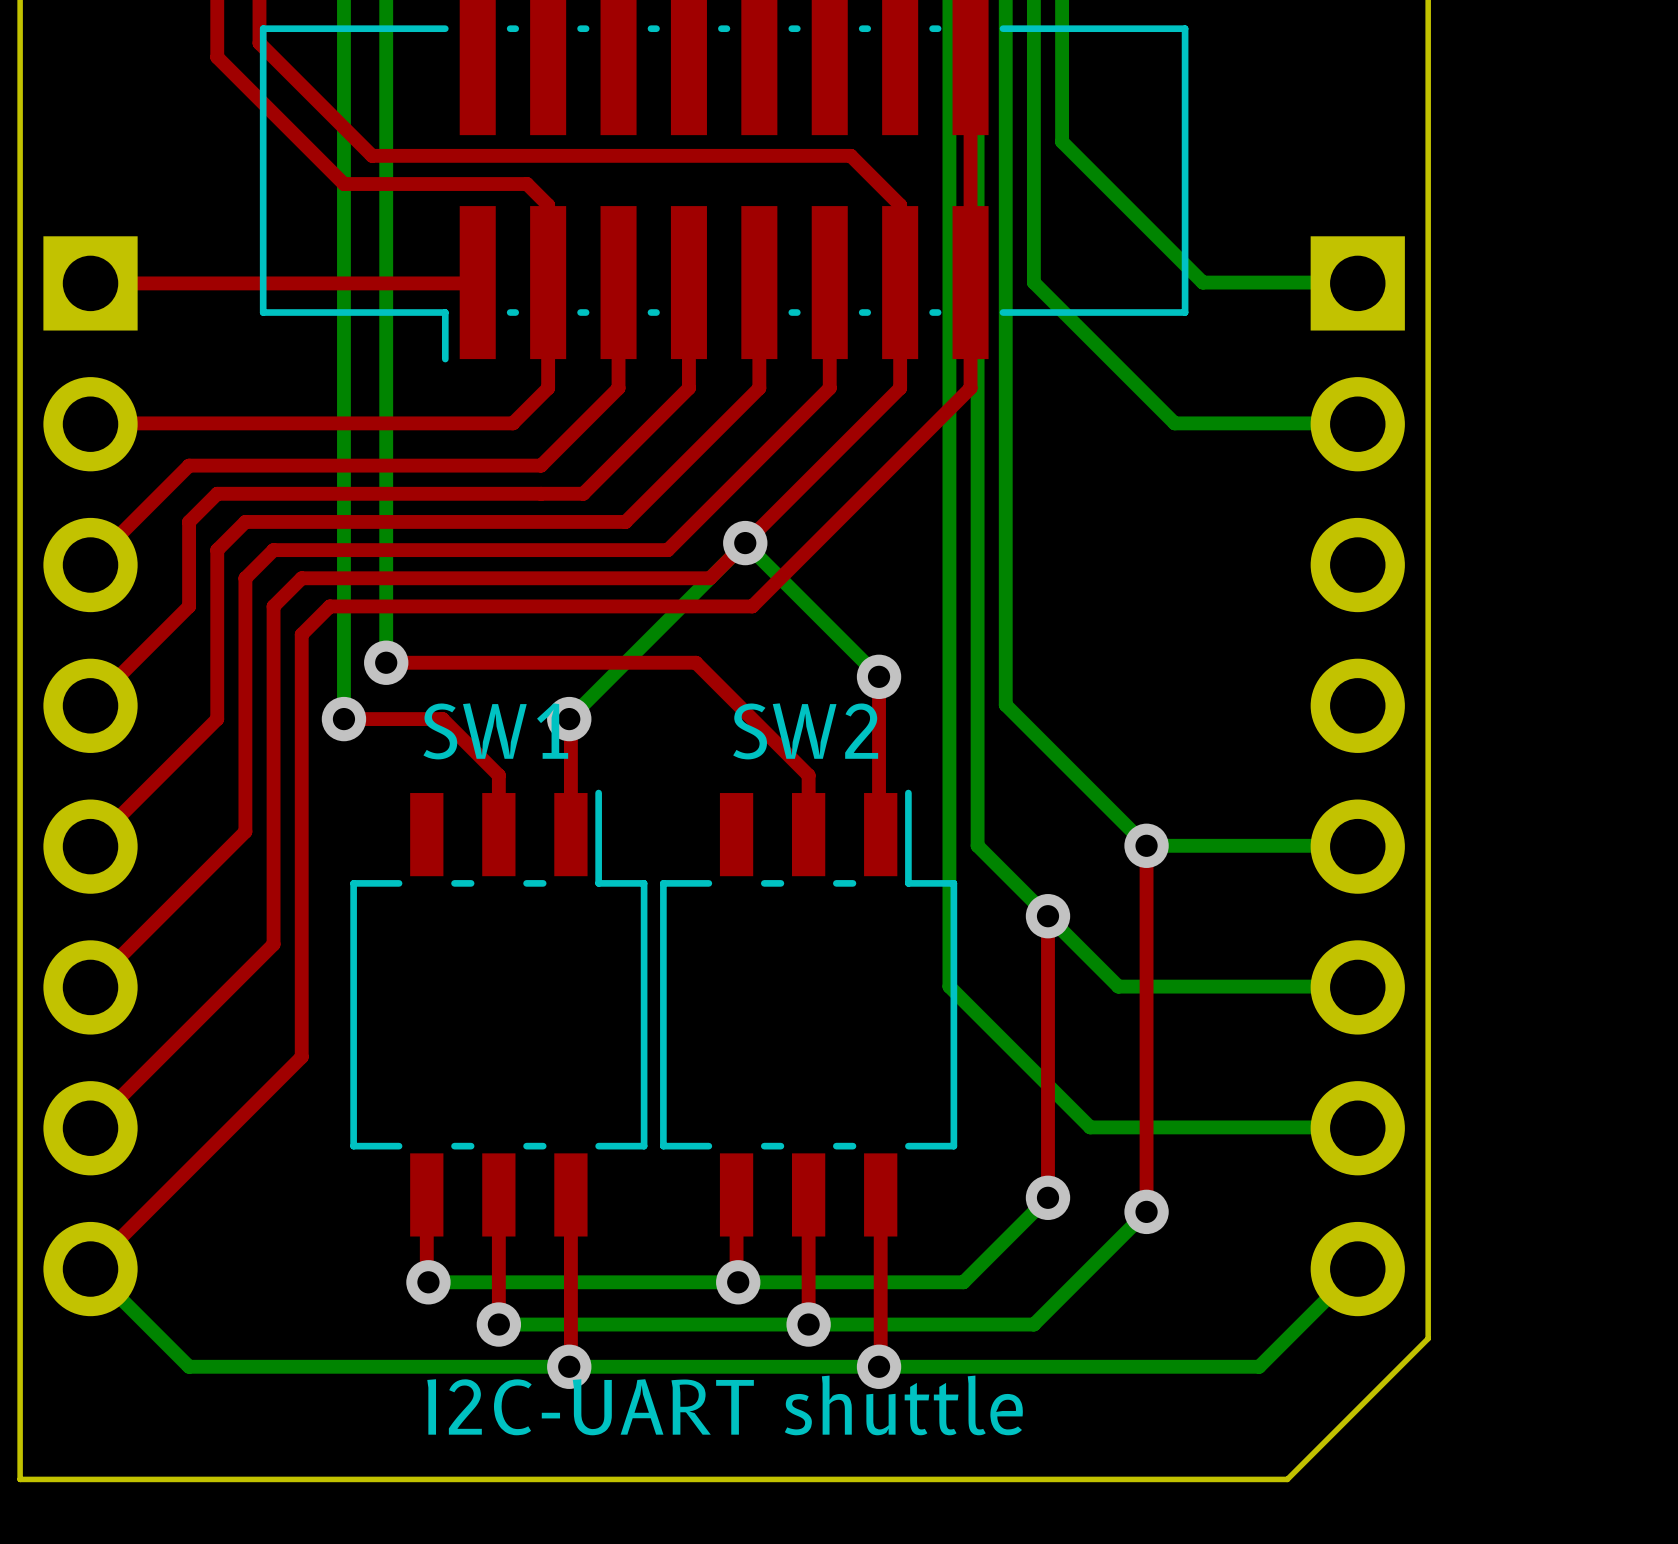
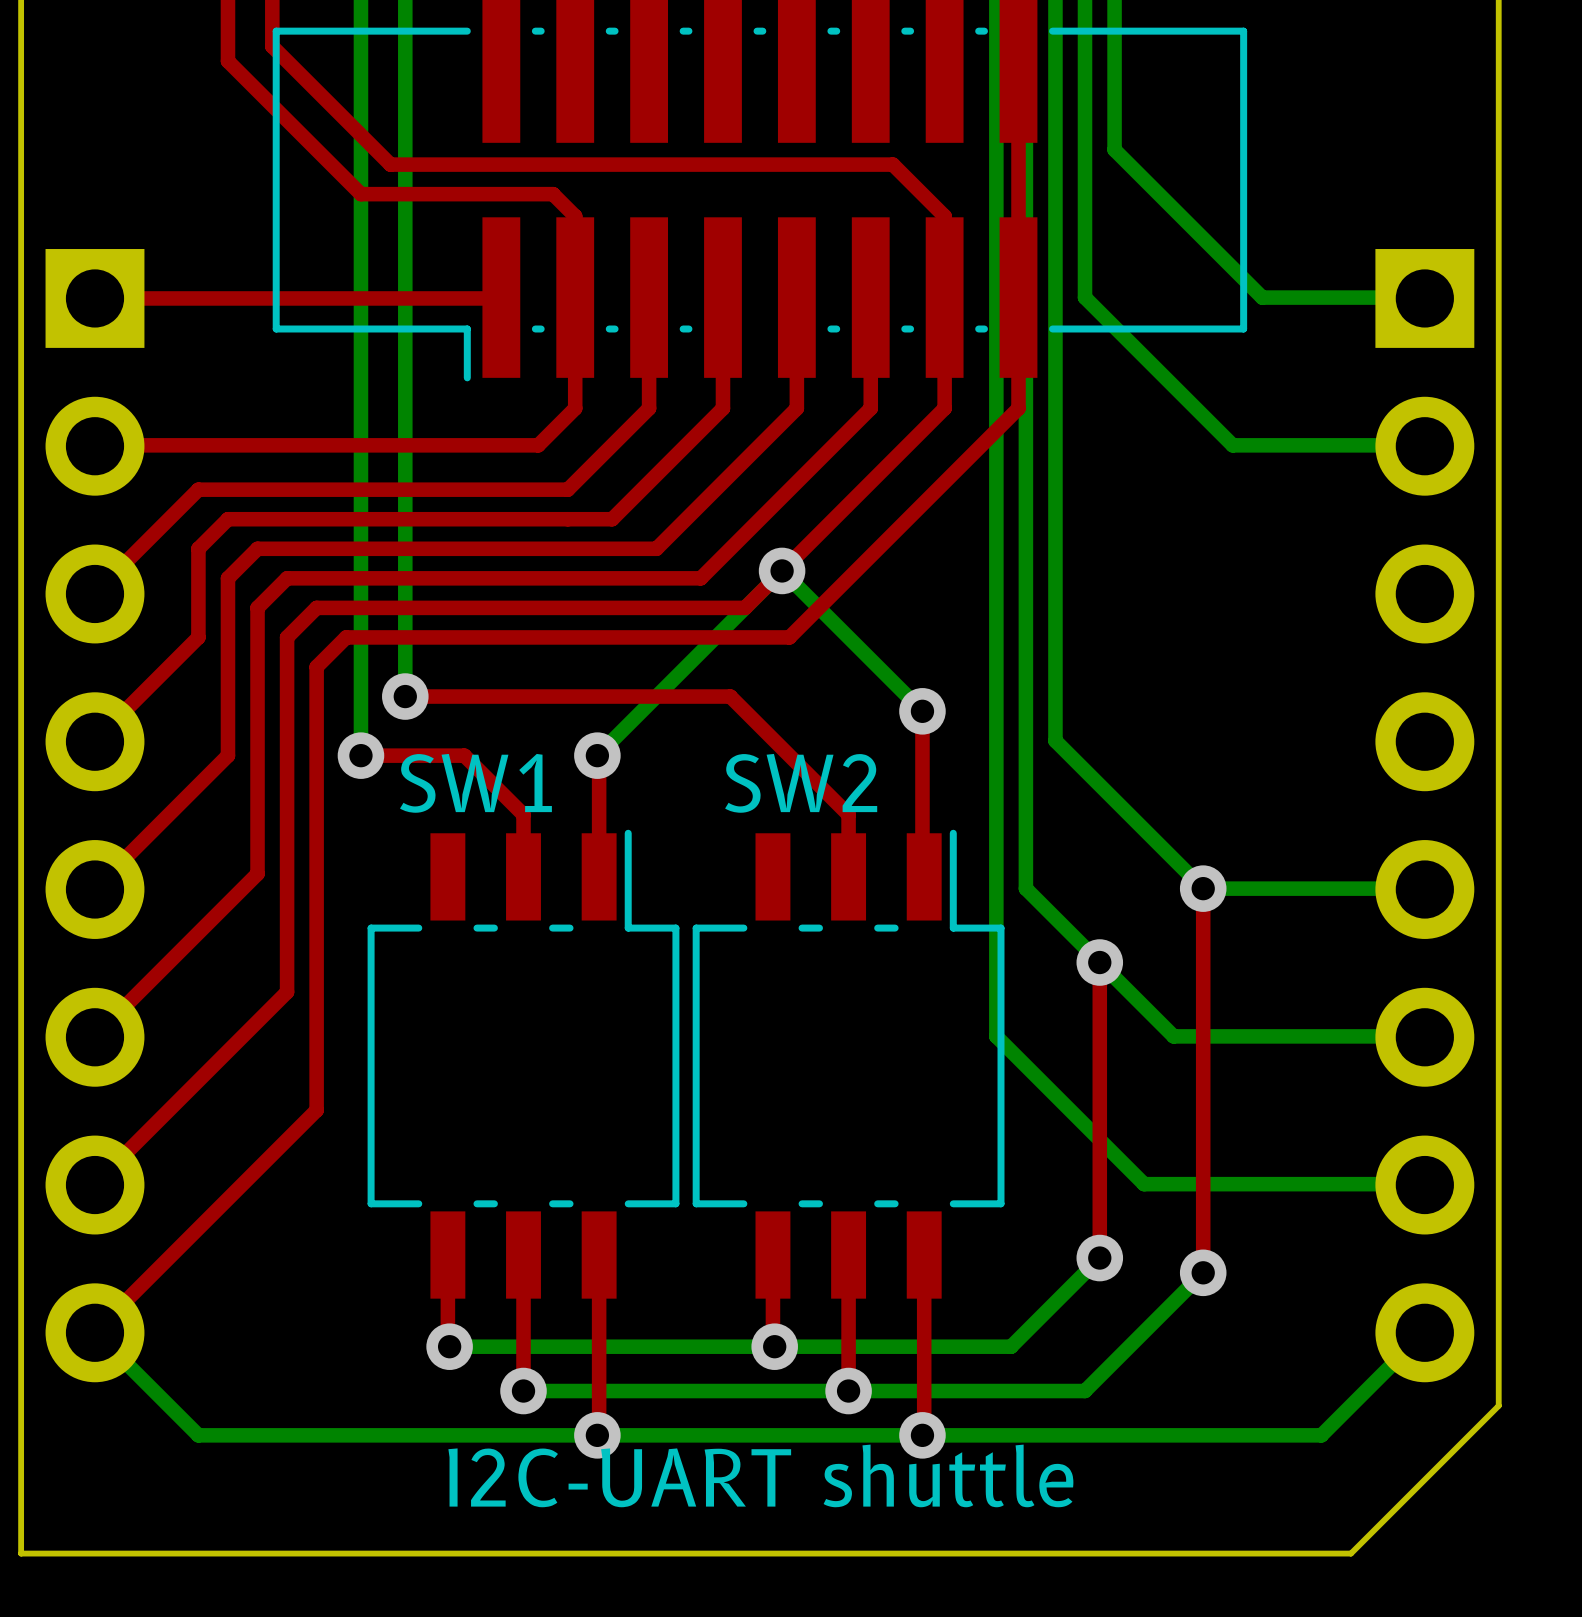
SW1 name position: SW1 (495, 731) -> SW1 (475, 783)
SW2 name position: SW2 (805, 731) -> SW2 (801, 783)

